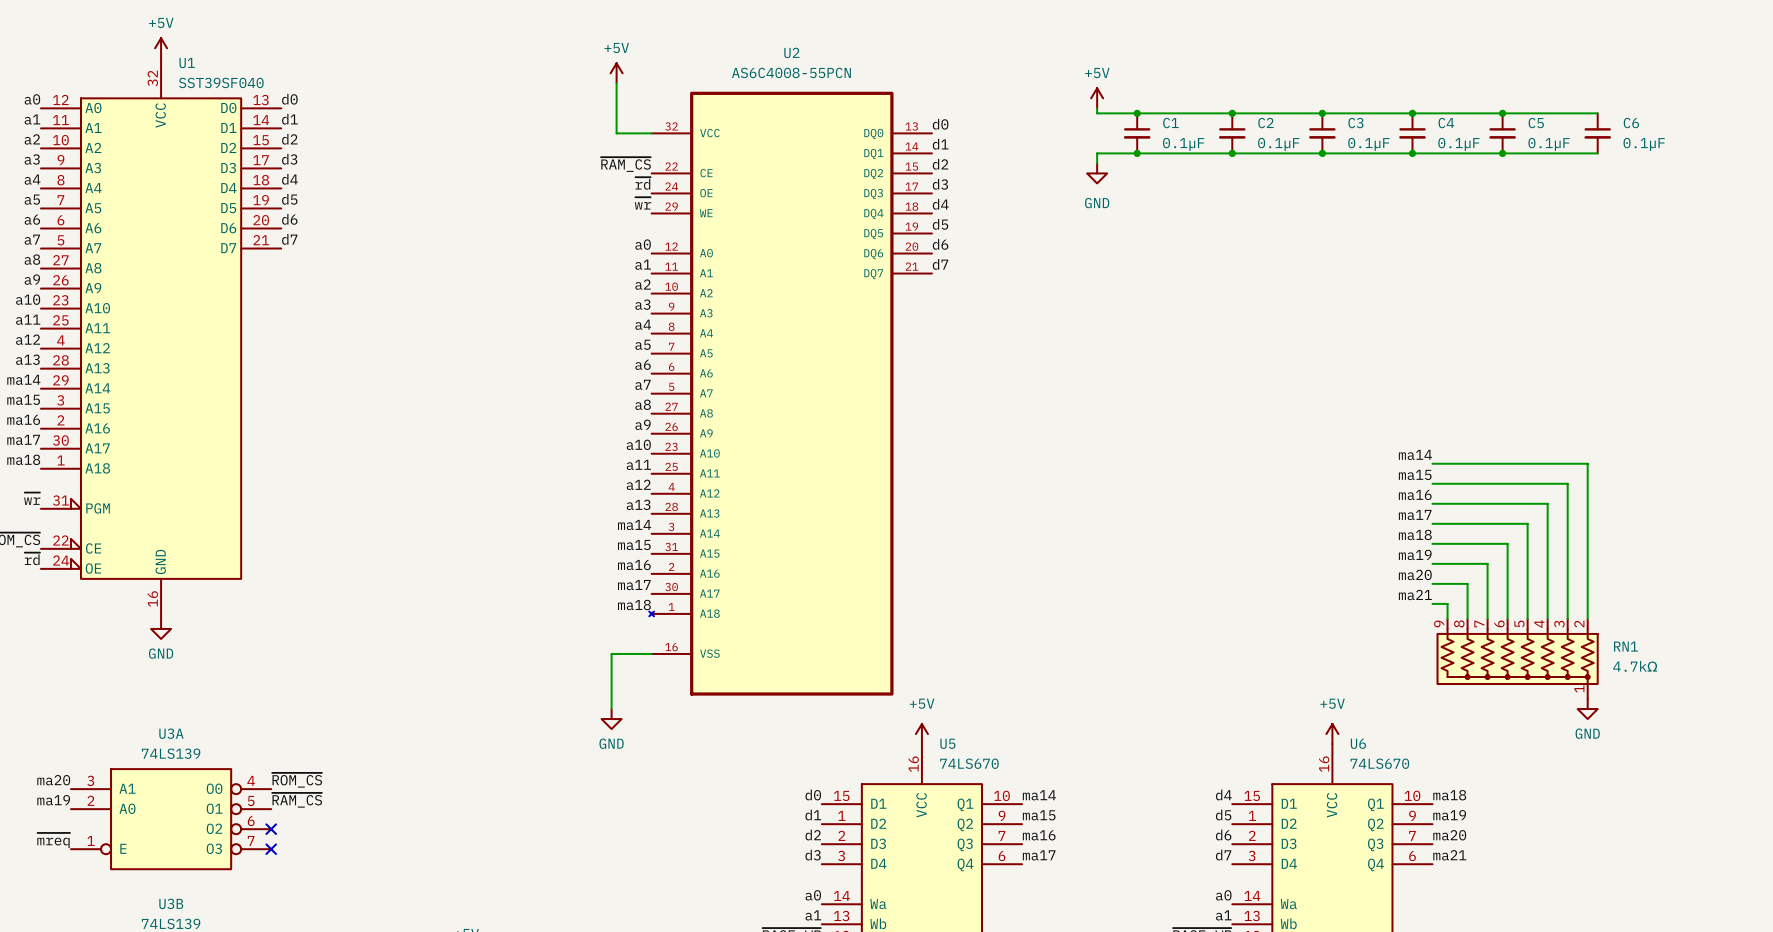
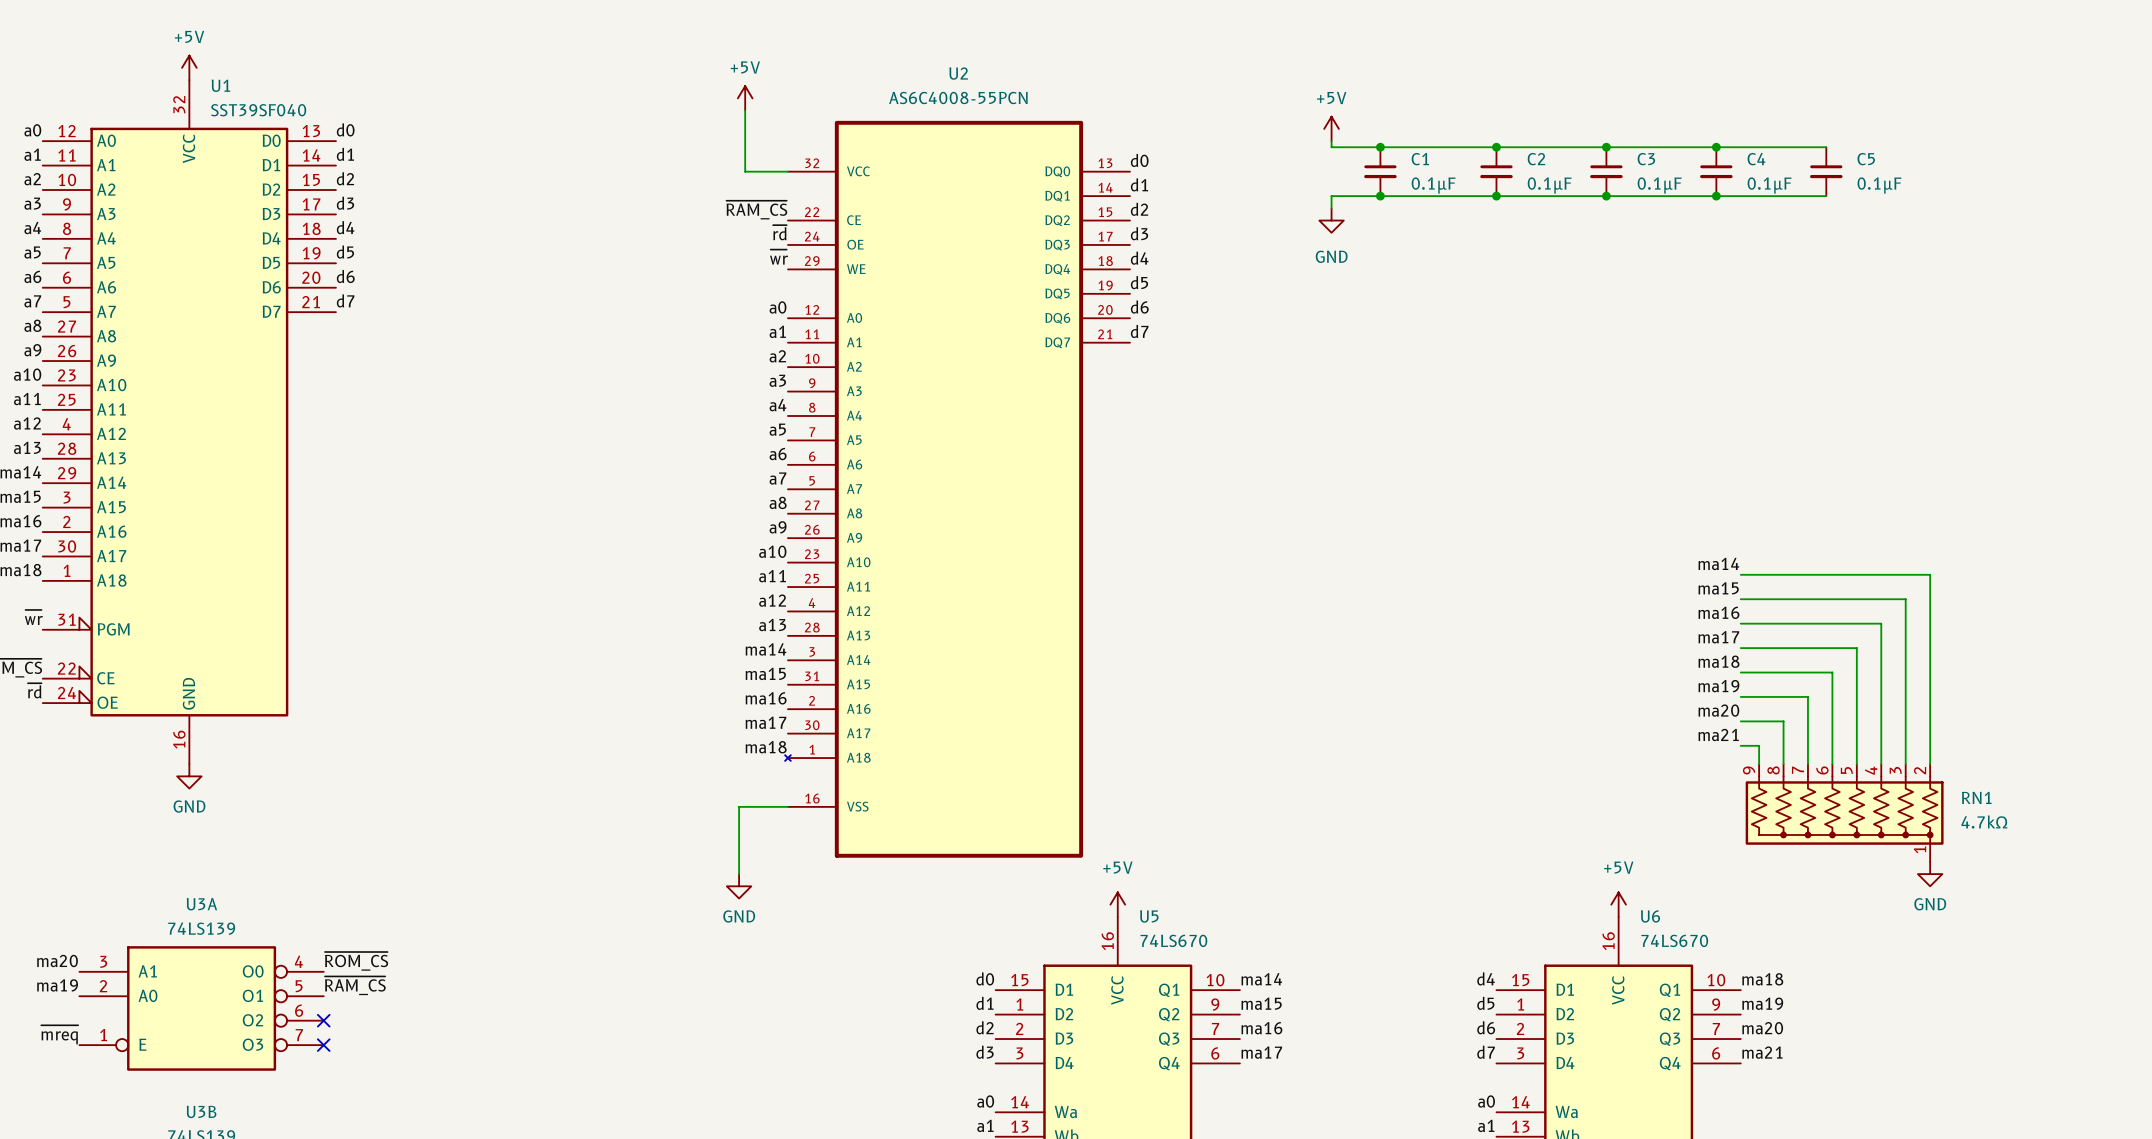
wire: (1502, 113) (1597, 113) -> none
junction: (1502, 113) -> none
C6: 0.1µF (1597, 133) -> none
wire: (1502, 153) (1597, 153) -> none
junction: (1502, 153) -> none

